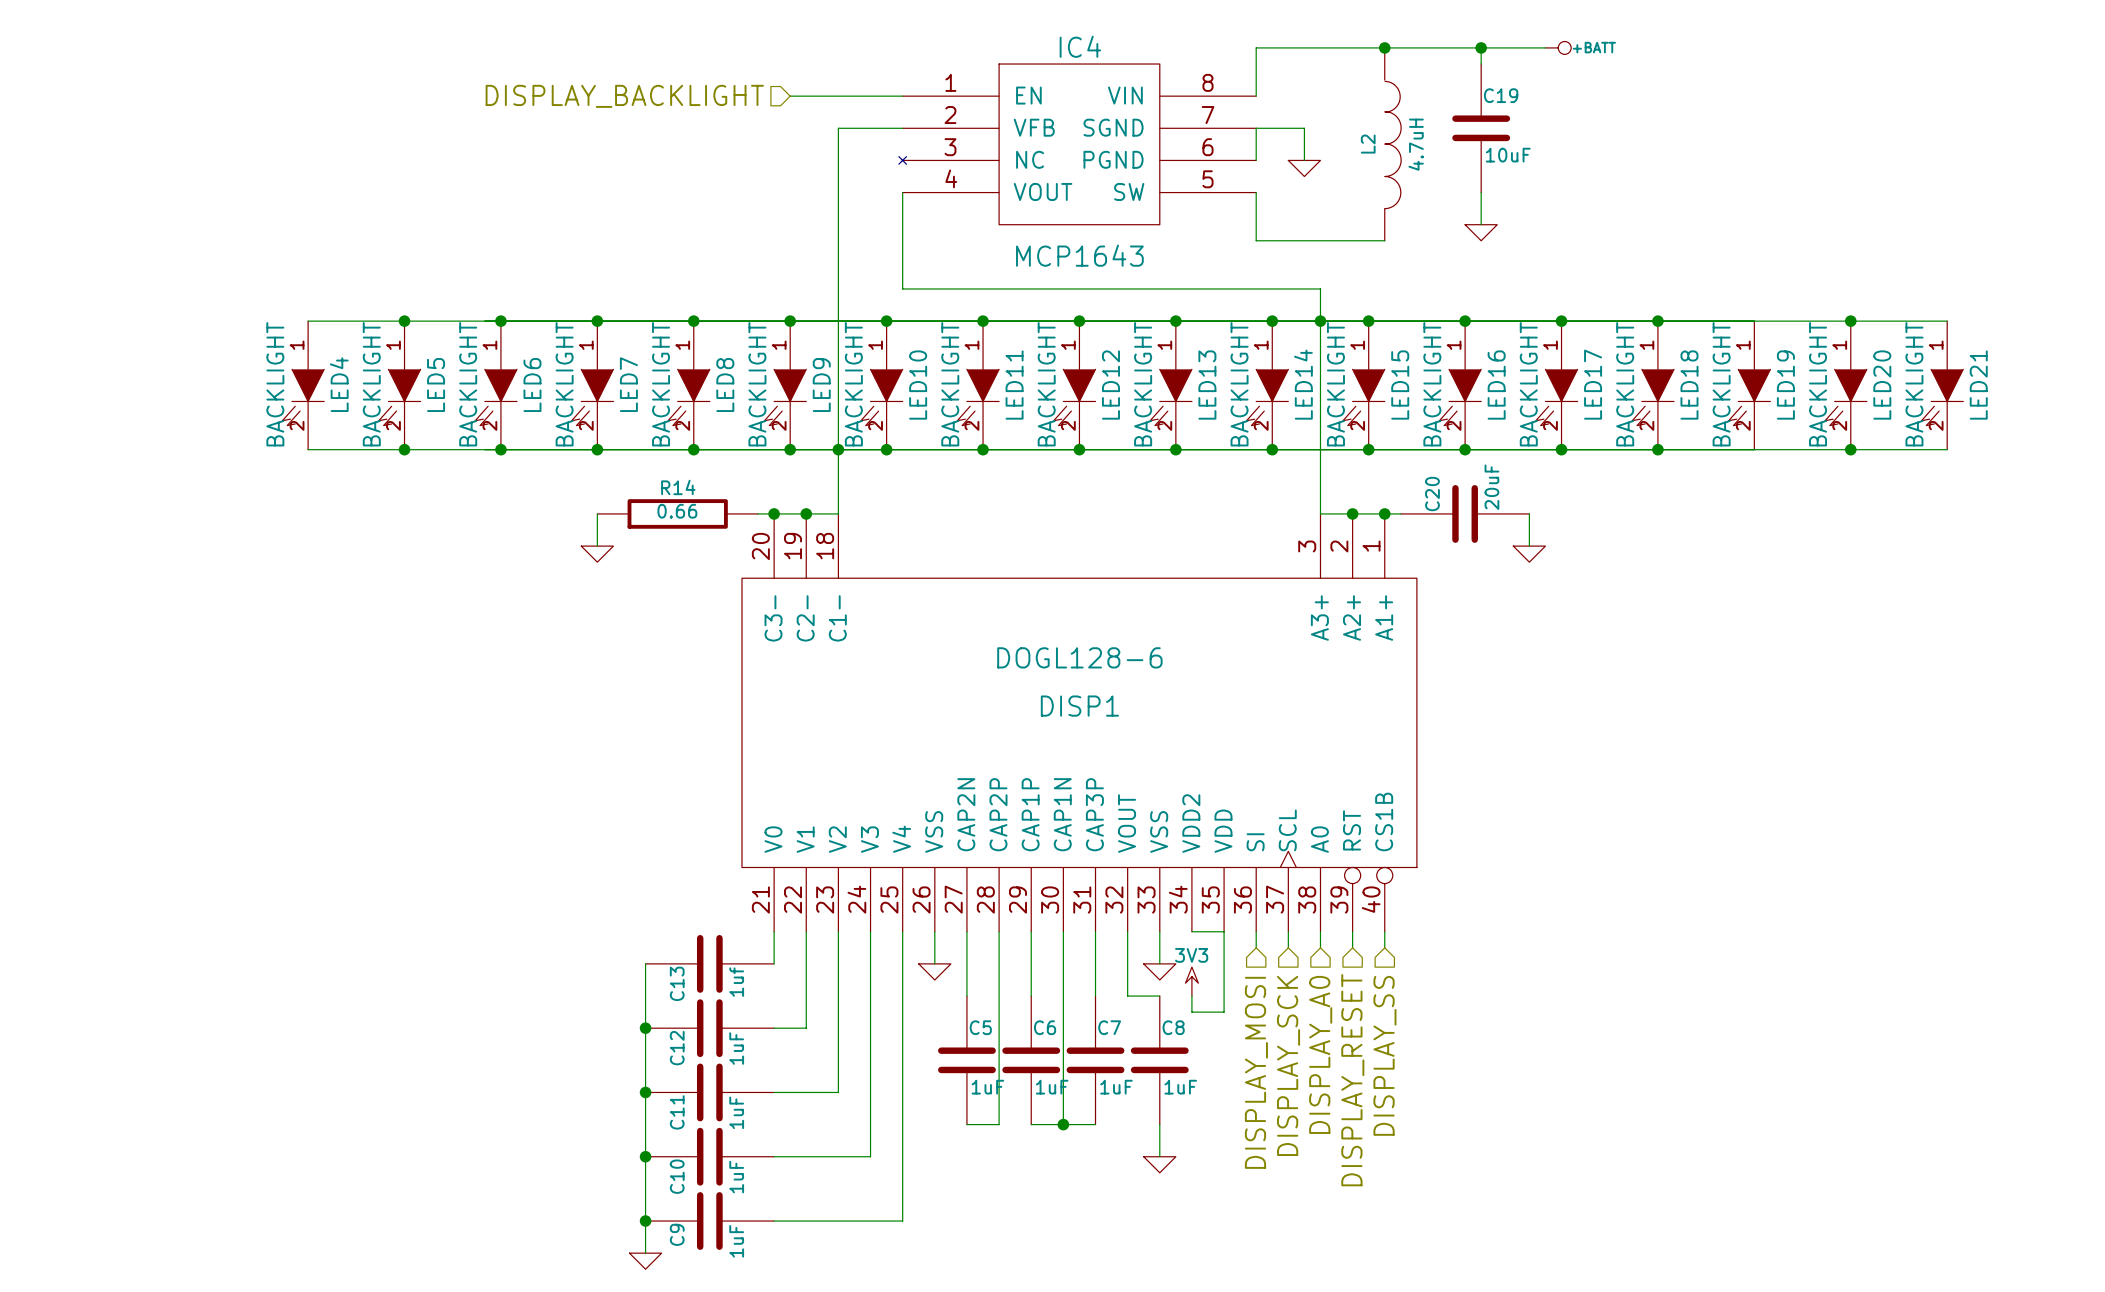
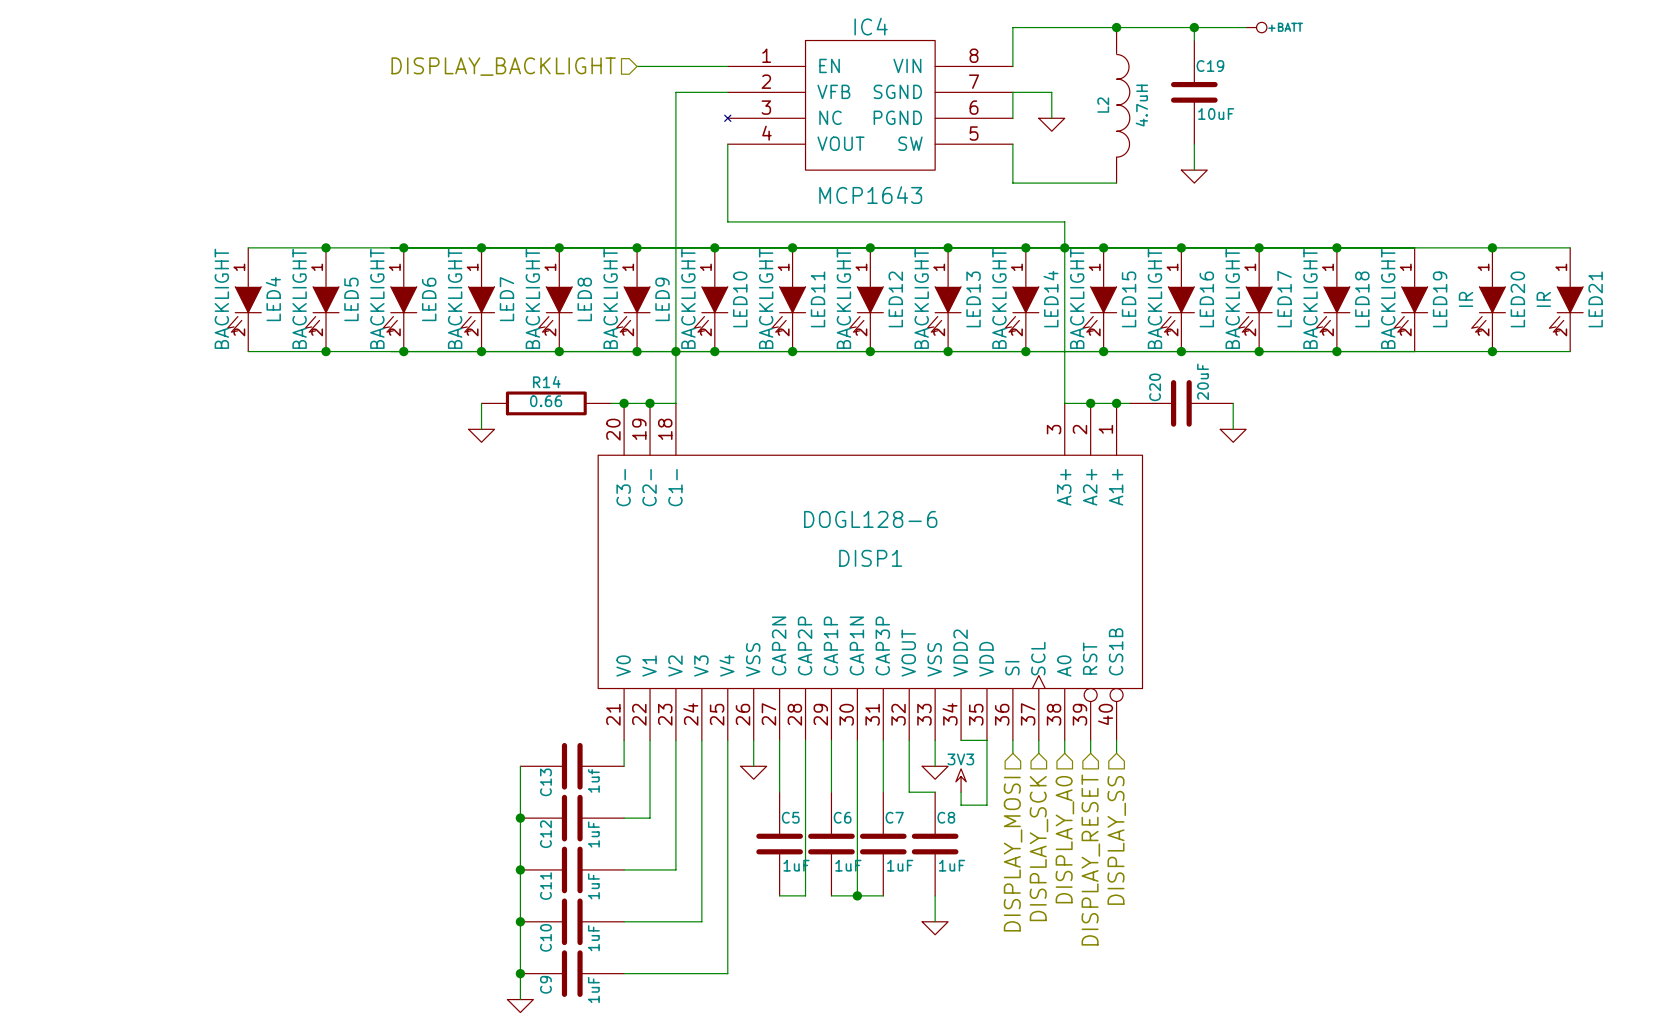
LED20 value: BACKLIGHT (1818, 384) -> IR (1466, 299)
LED21 value: BACKLIGHT (1914, 384) -> IR (1543, 299)

